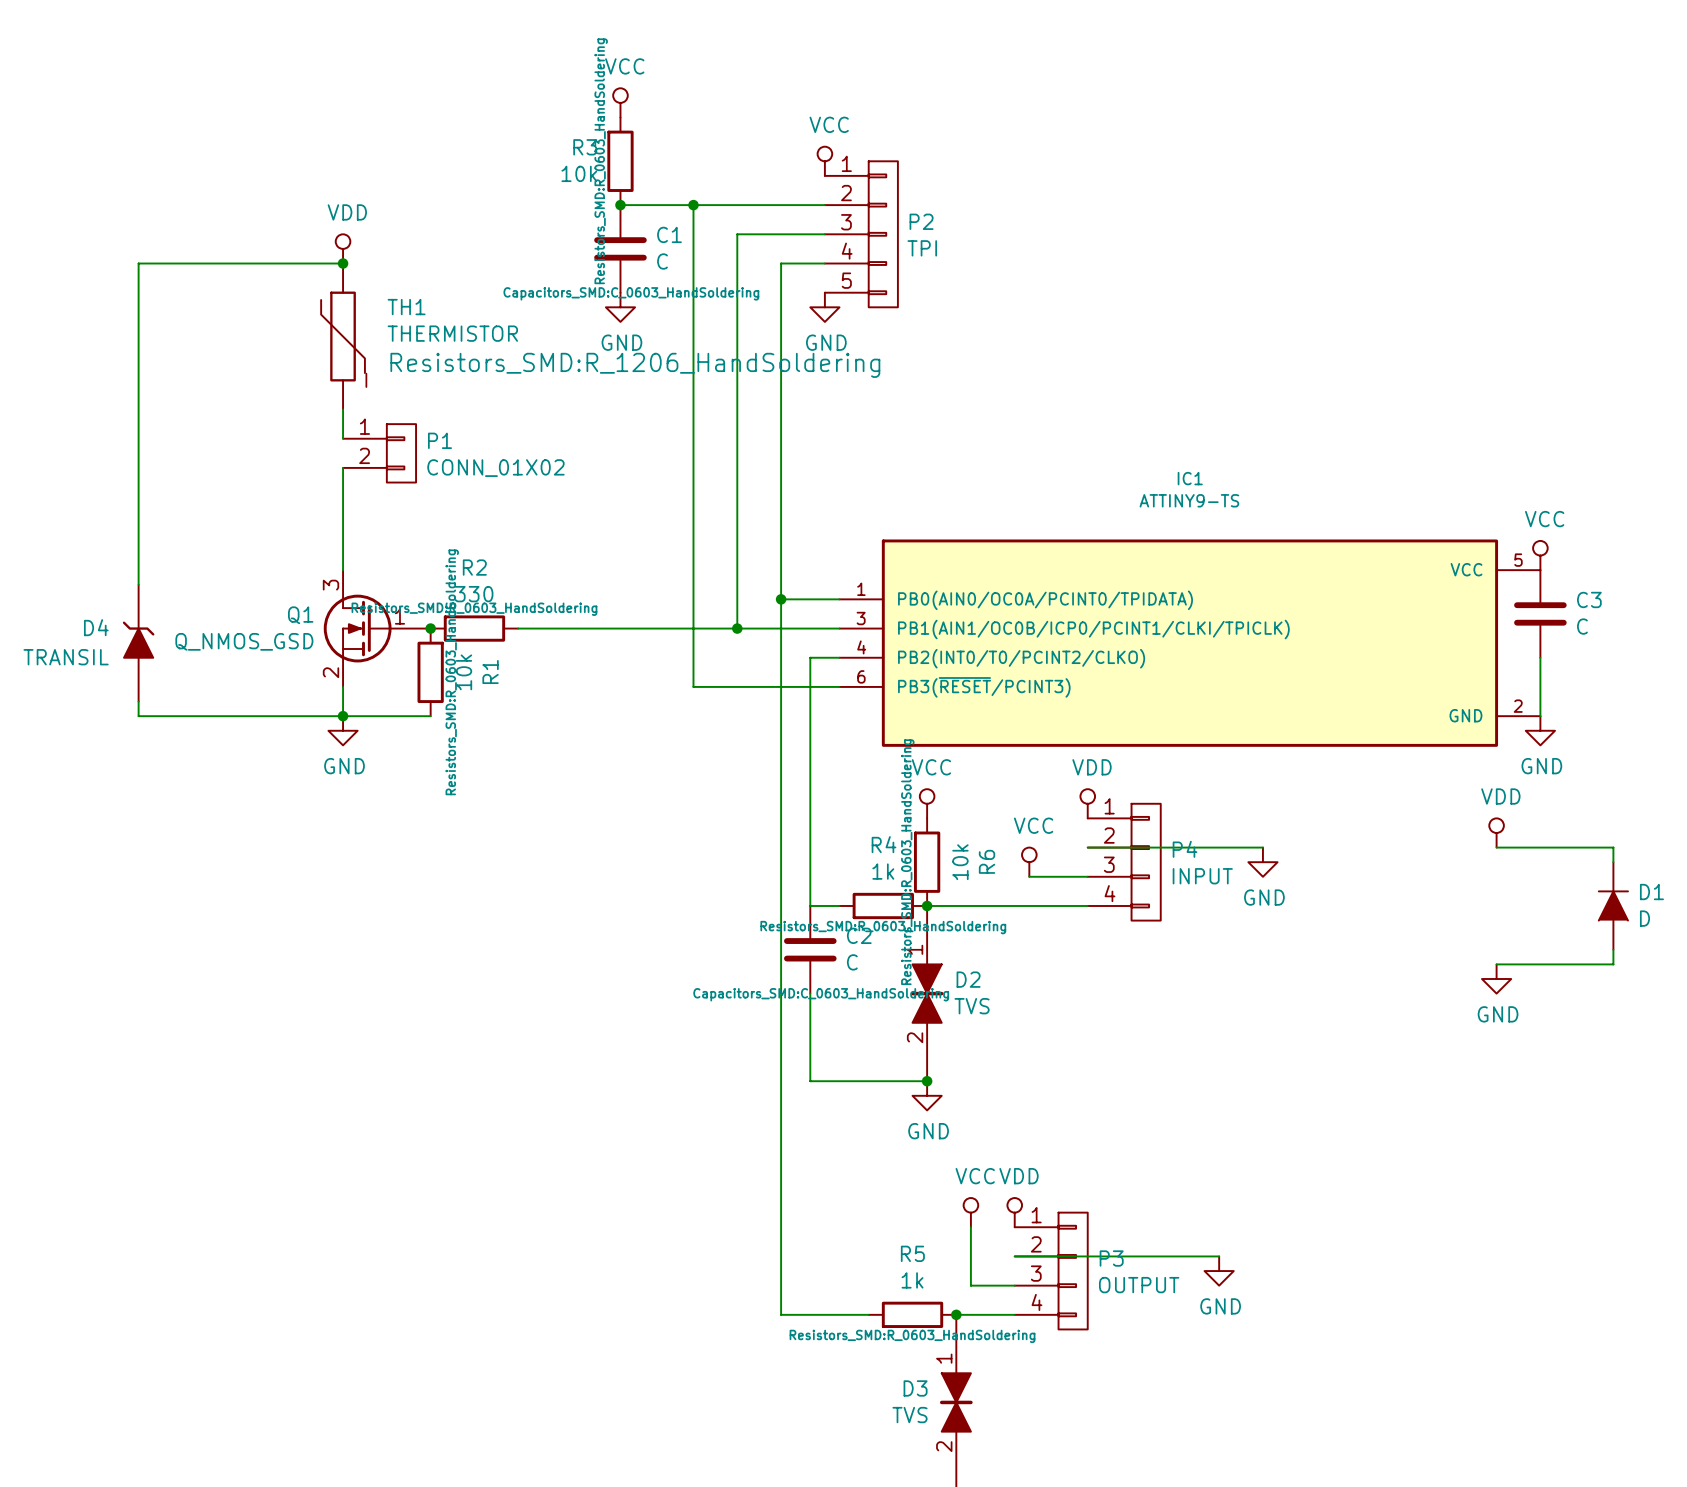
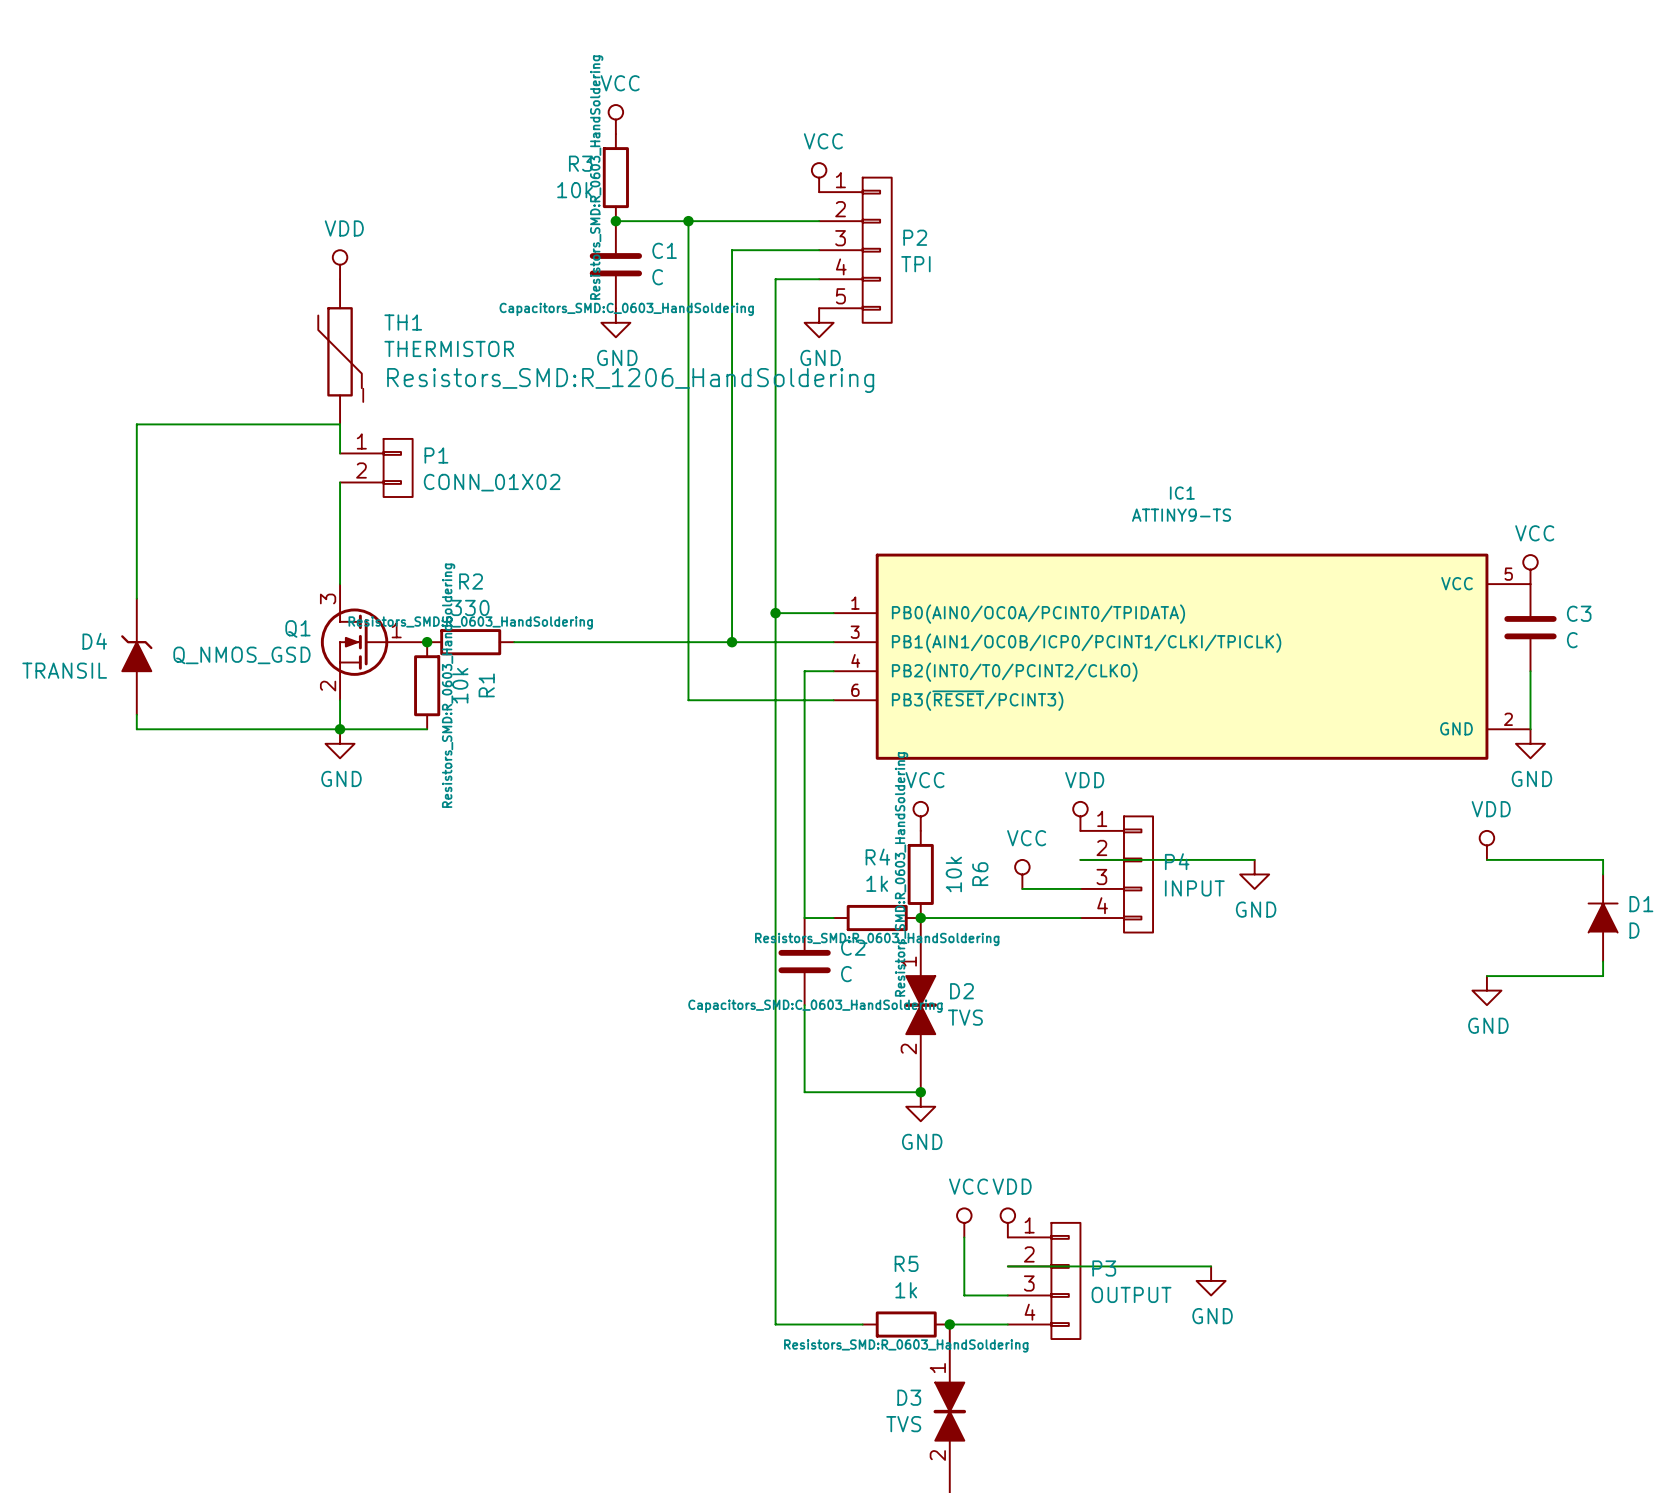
wire: (343, 263) (138, 263) (138, 409) -> (340, 424) (136, 424)
junction: (343, 263) -> none

